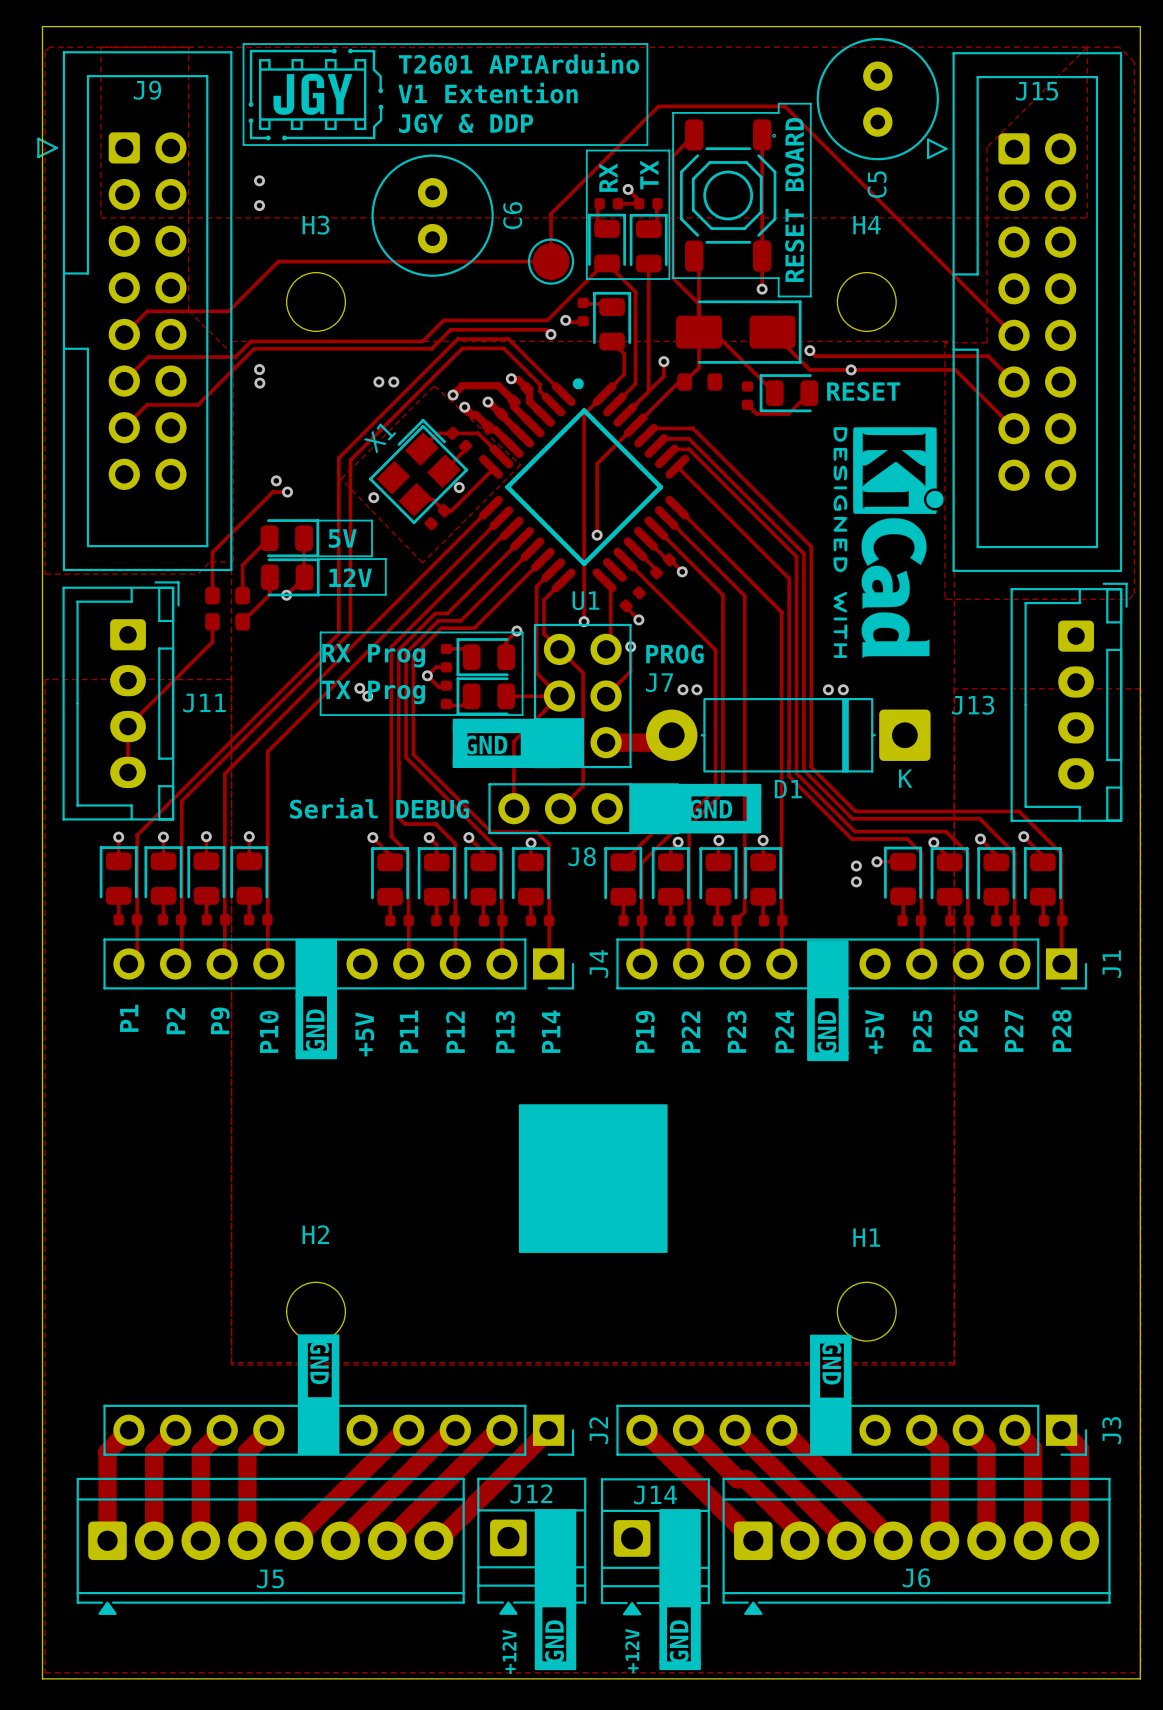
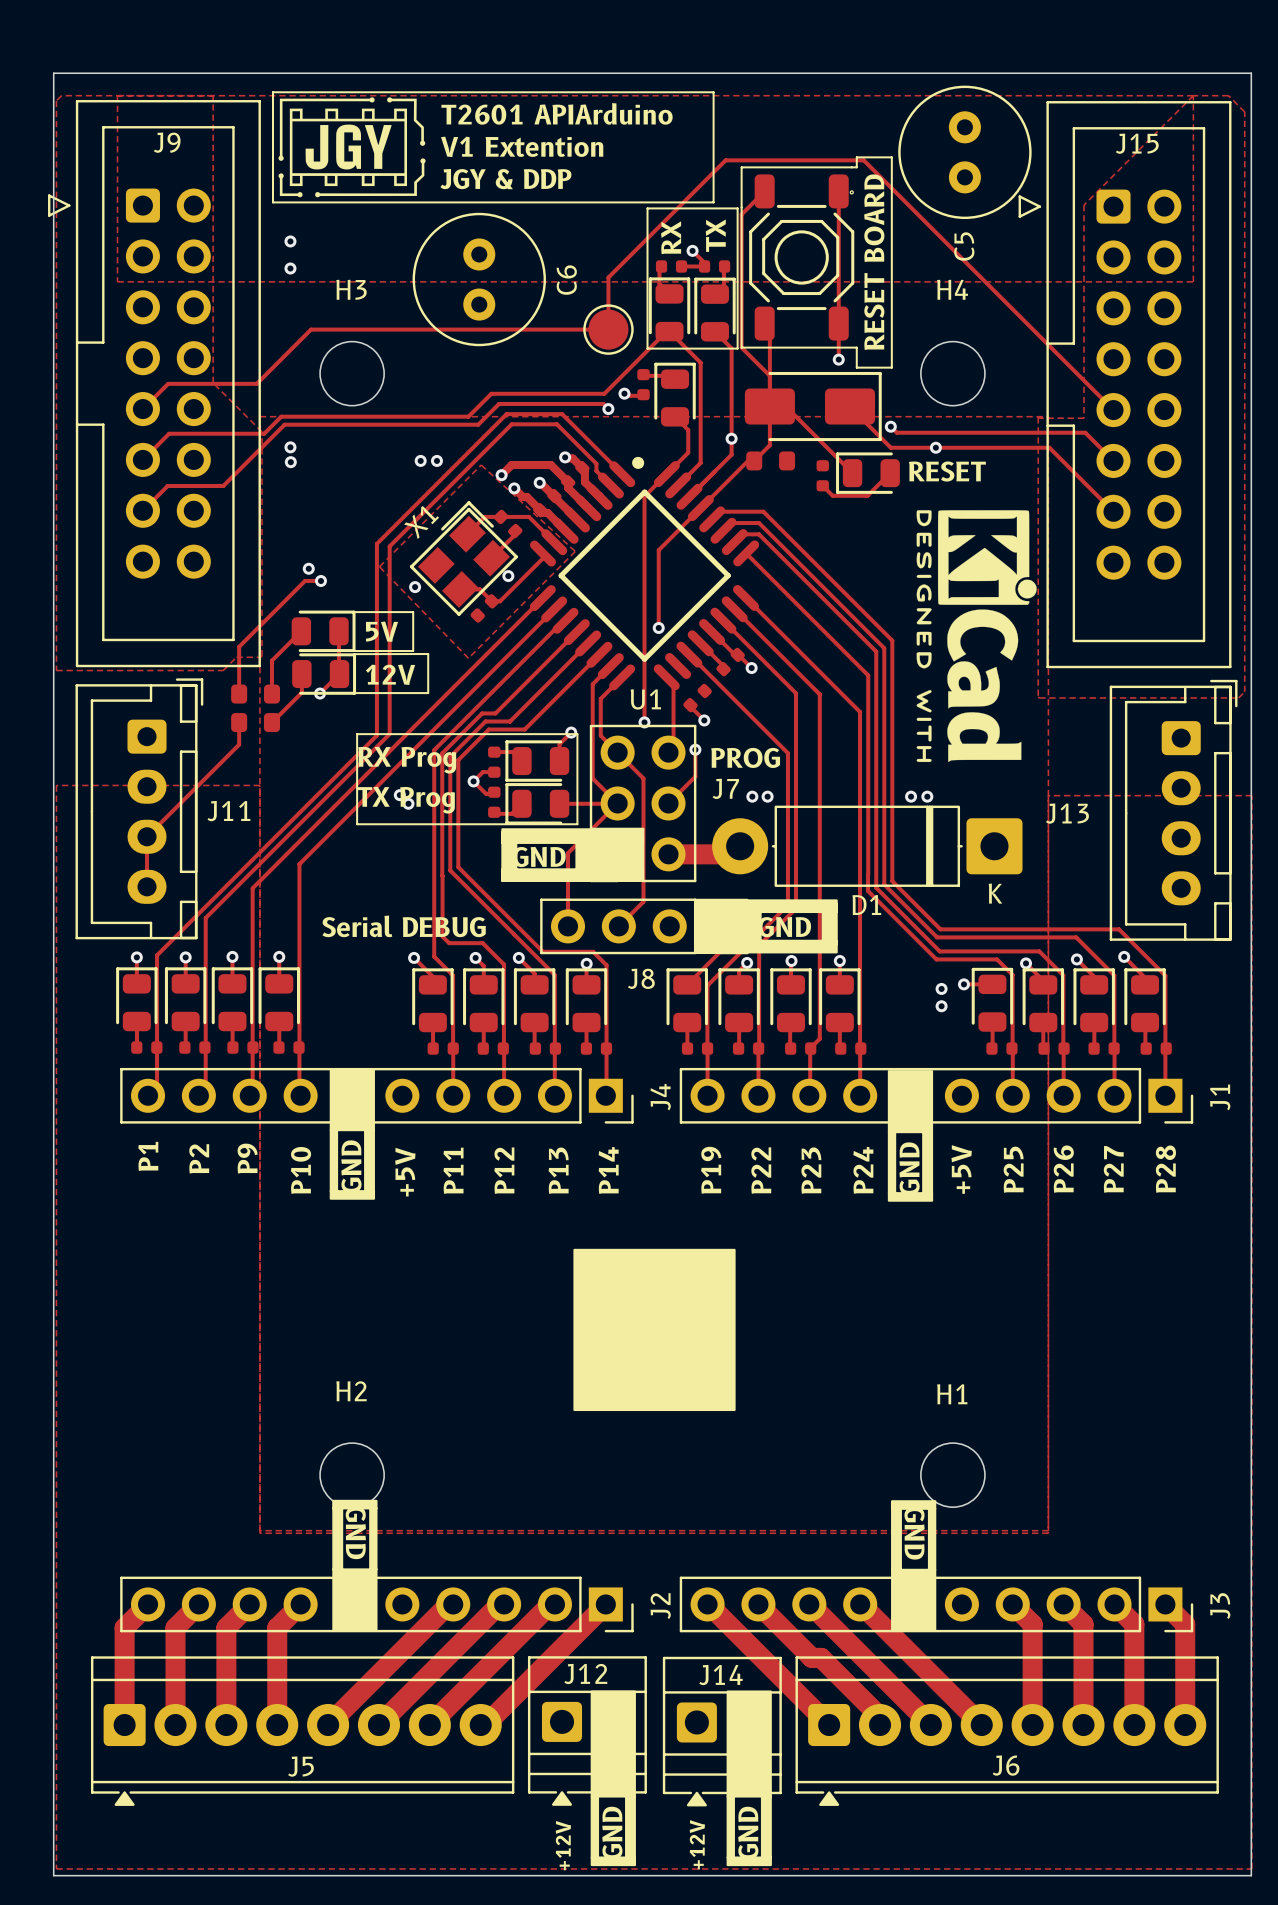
track: (648, 263) (648, 391) -> (714, 331) (731, 348) (731, 438)

